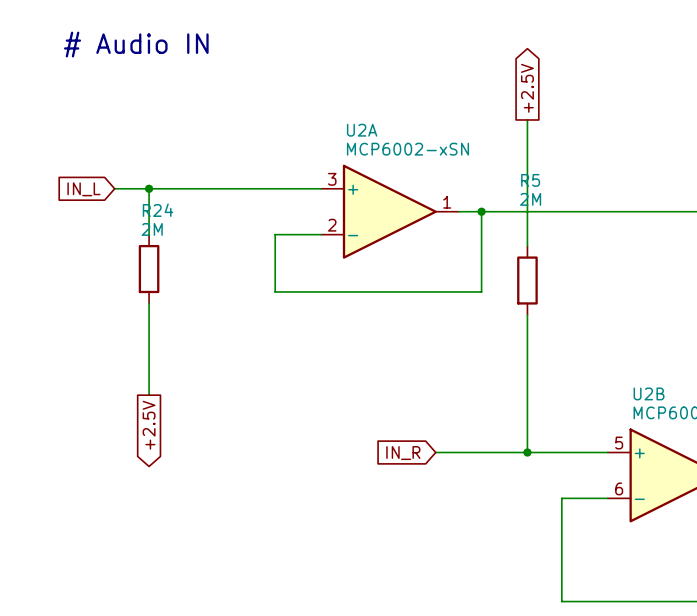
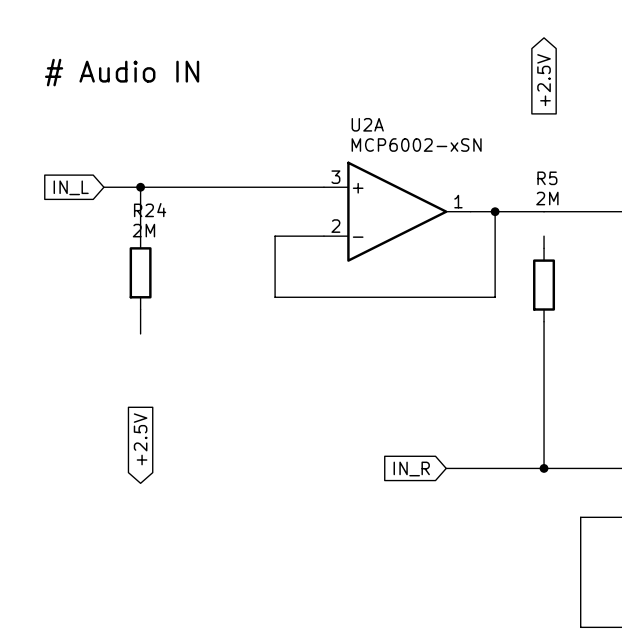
text position: # Audio IN (136, 44) -> # Audio IN (122, 72)
wire: (527, 119) (527, 234) -> none
wire: (149, 326) (149, 395) -> none

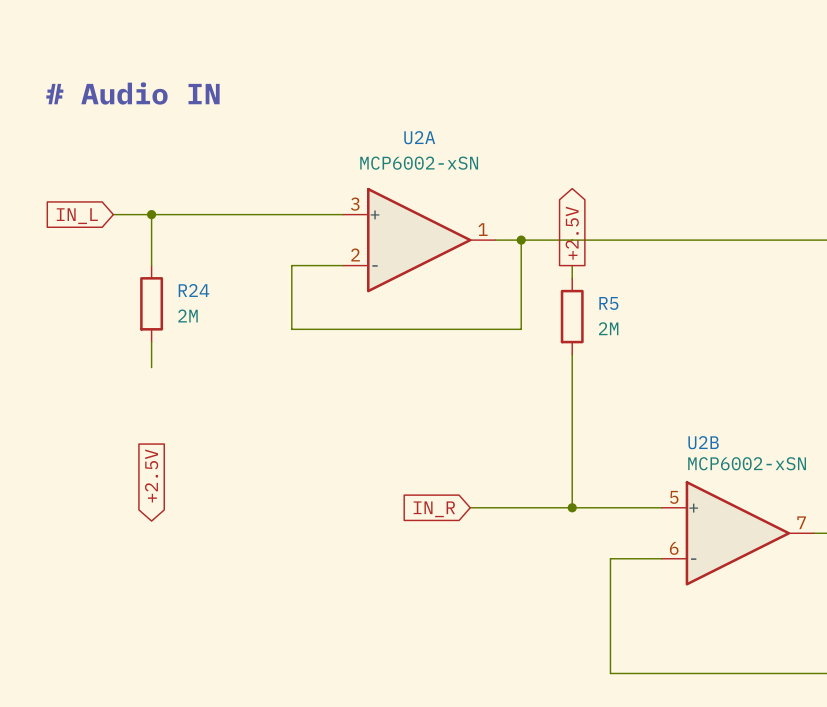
global label position: +2.5V (544, 80) -> +2.5V (572, 233)
U2A name position: U2A (367, 124) -> U2A (419, 137)
U2A value position: MCP6002-xSN (416, 145) -> MCP6002-xSN (419, 163)
R5 name position: R5 (547, 178) -> R5 (608, 303)
R5 value position: 2M (547, 198) -> 2M (608, 328)
R24 name position: R24 (150, 210) -> R24 (193, 290)
R24 value position: 2M (143, 230) -> 2M (188, 315)

